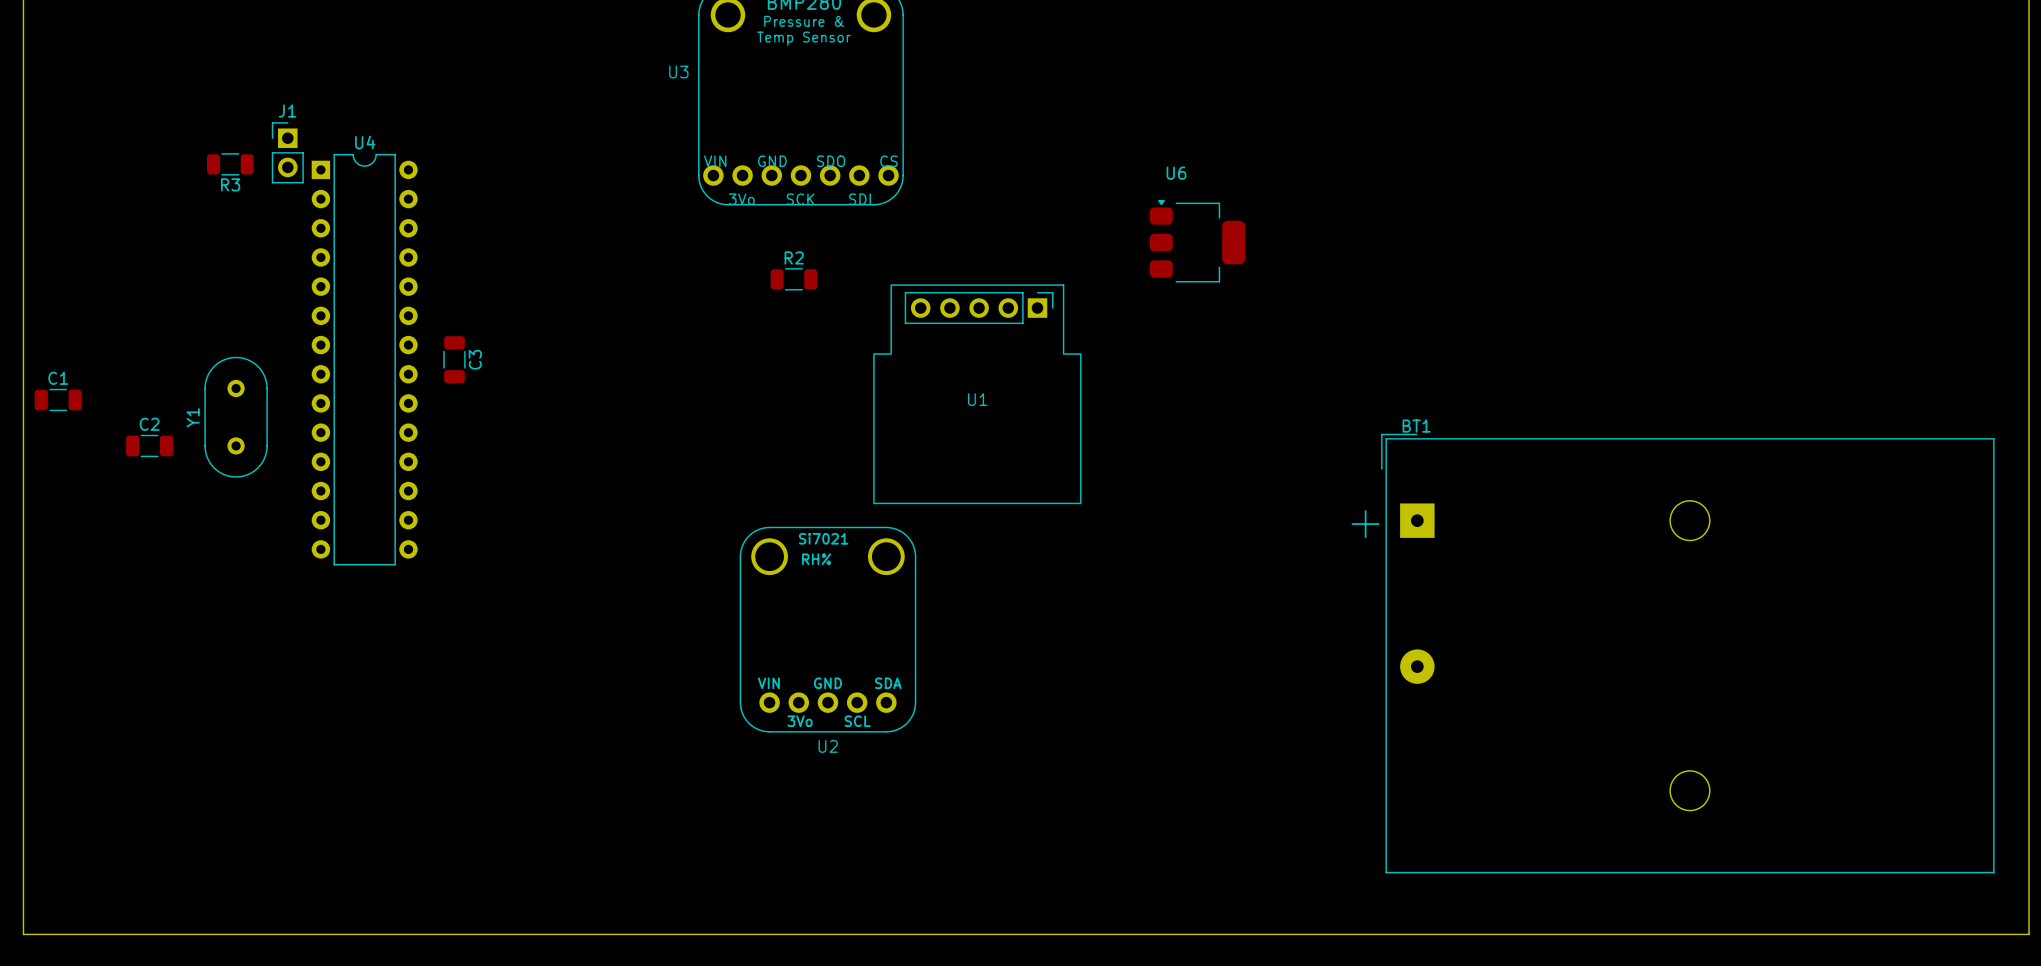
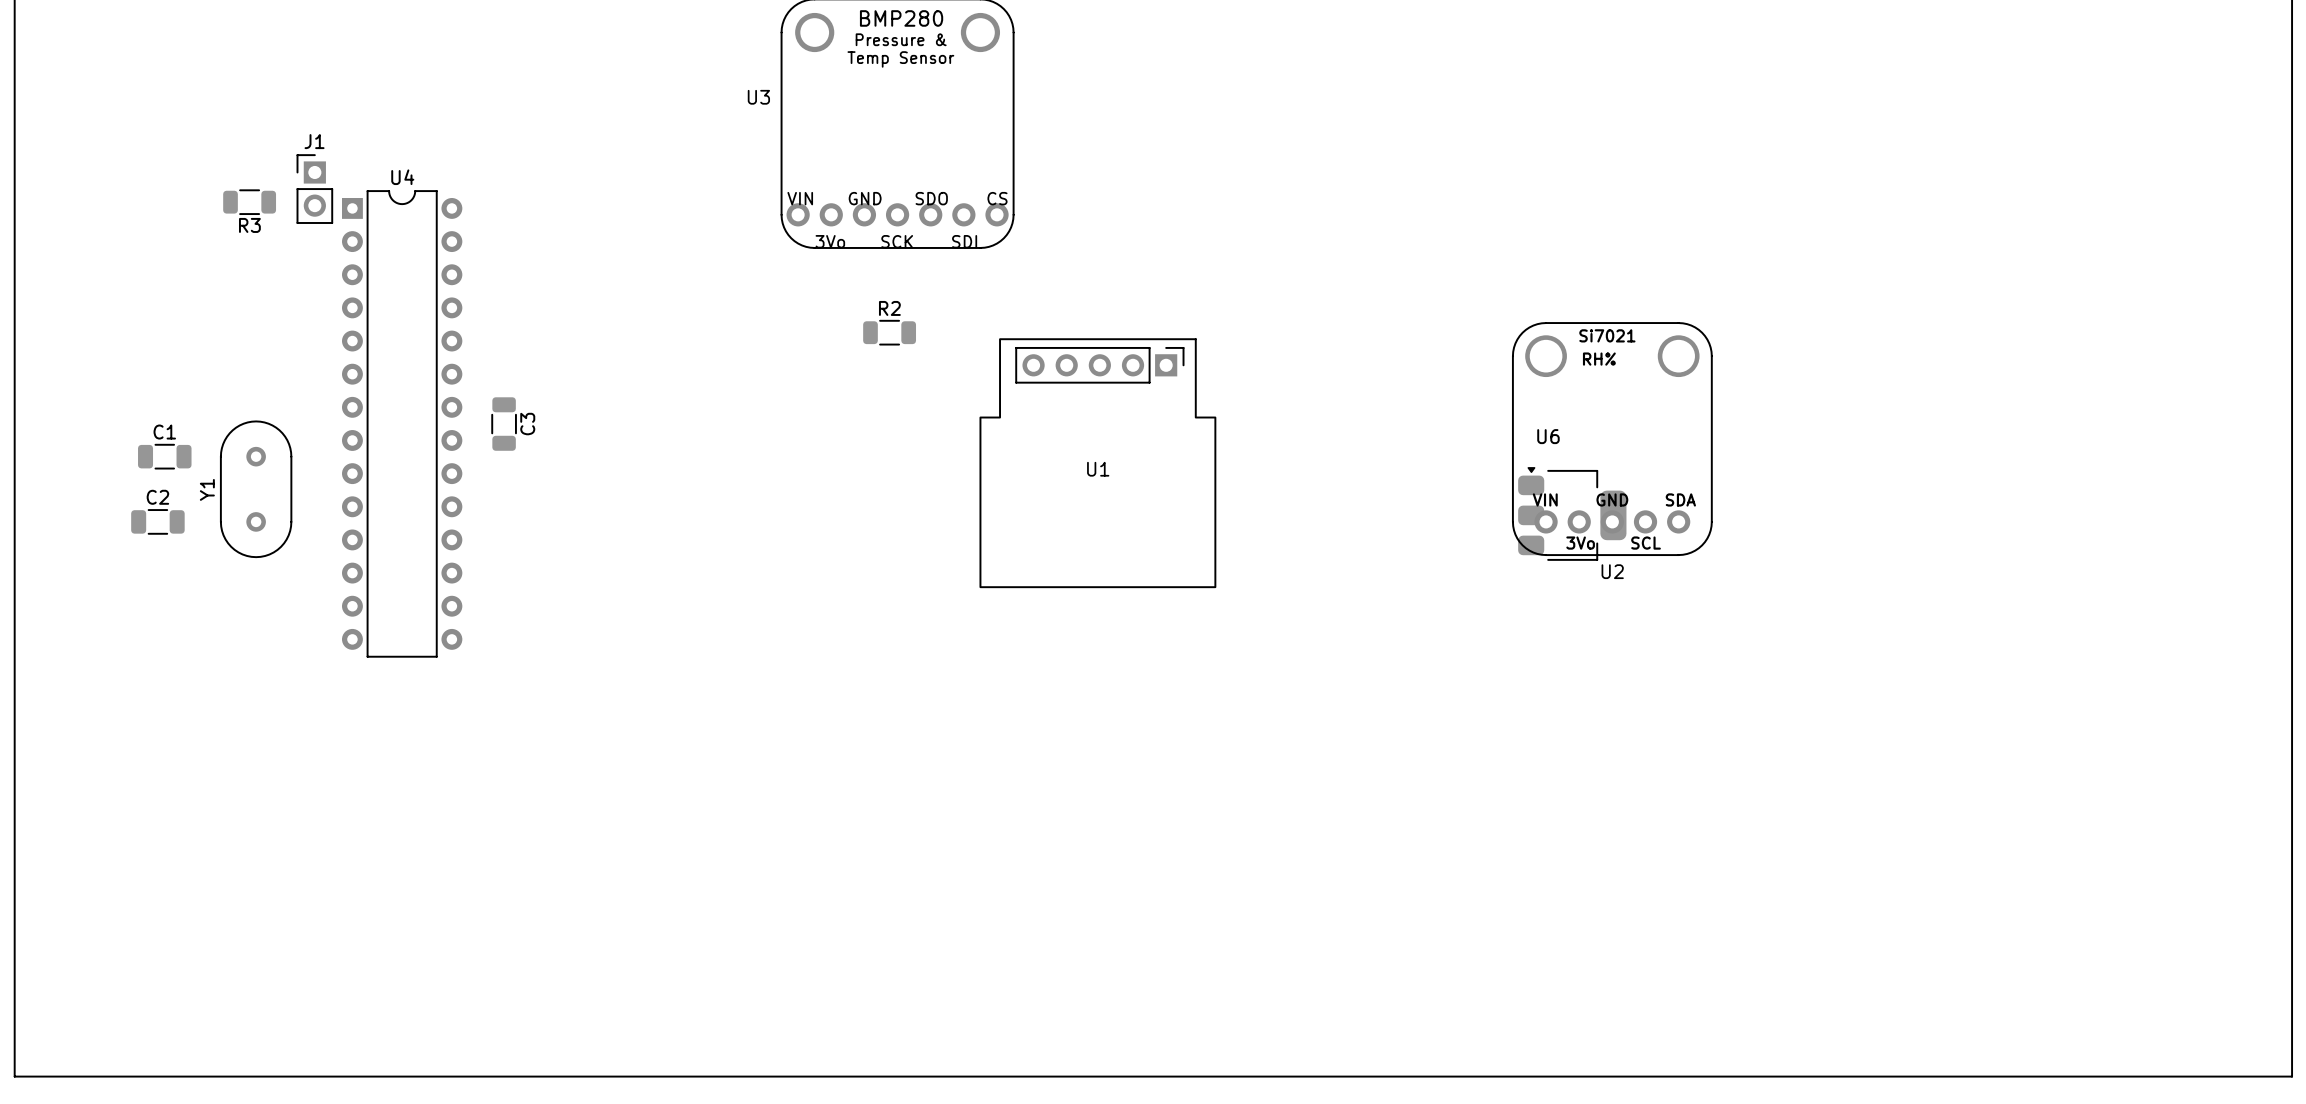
U6 position: (1197, 241) -> (1572, 513)
C1 position: (58, 399) -> (164, 456)
U2 position: (827, 629) -> (1612, 439)
BT1: (1687, 653) -> none

